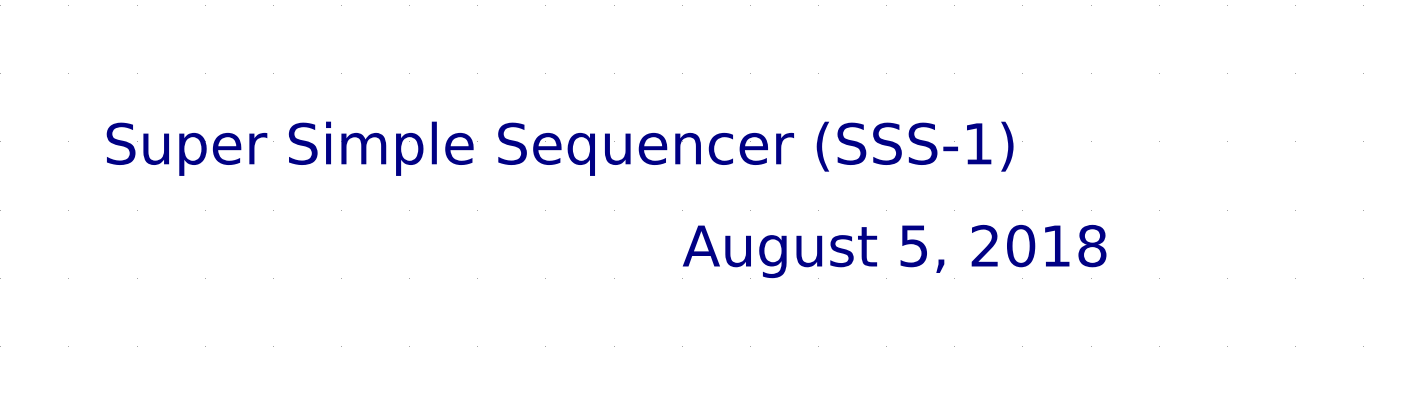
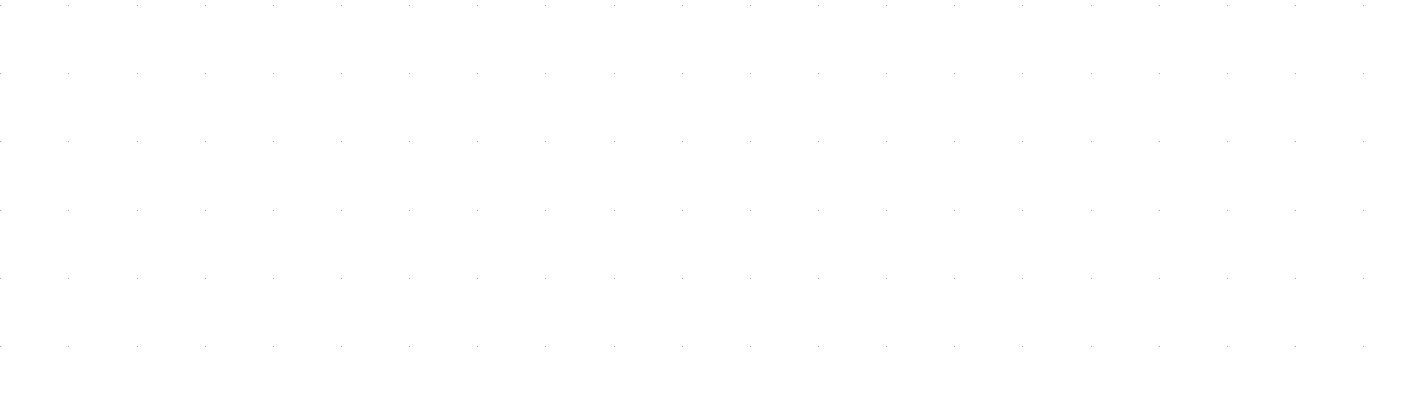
text: Super Simple Sequencer (SSS-1) (560, 148) -> none
text: August 5, 2018 (894, 251) -> none

